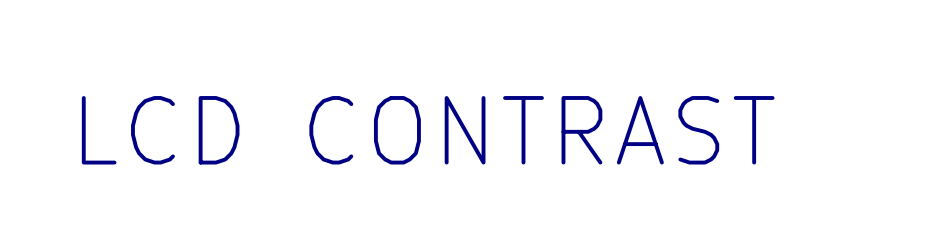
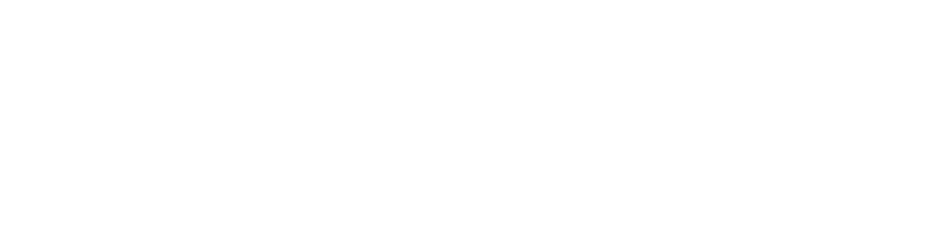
text: LCD CONTRAST (428, 130) -> none

